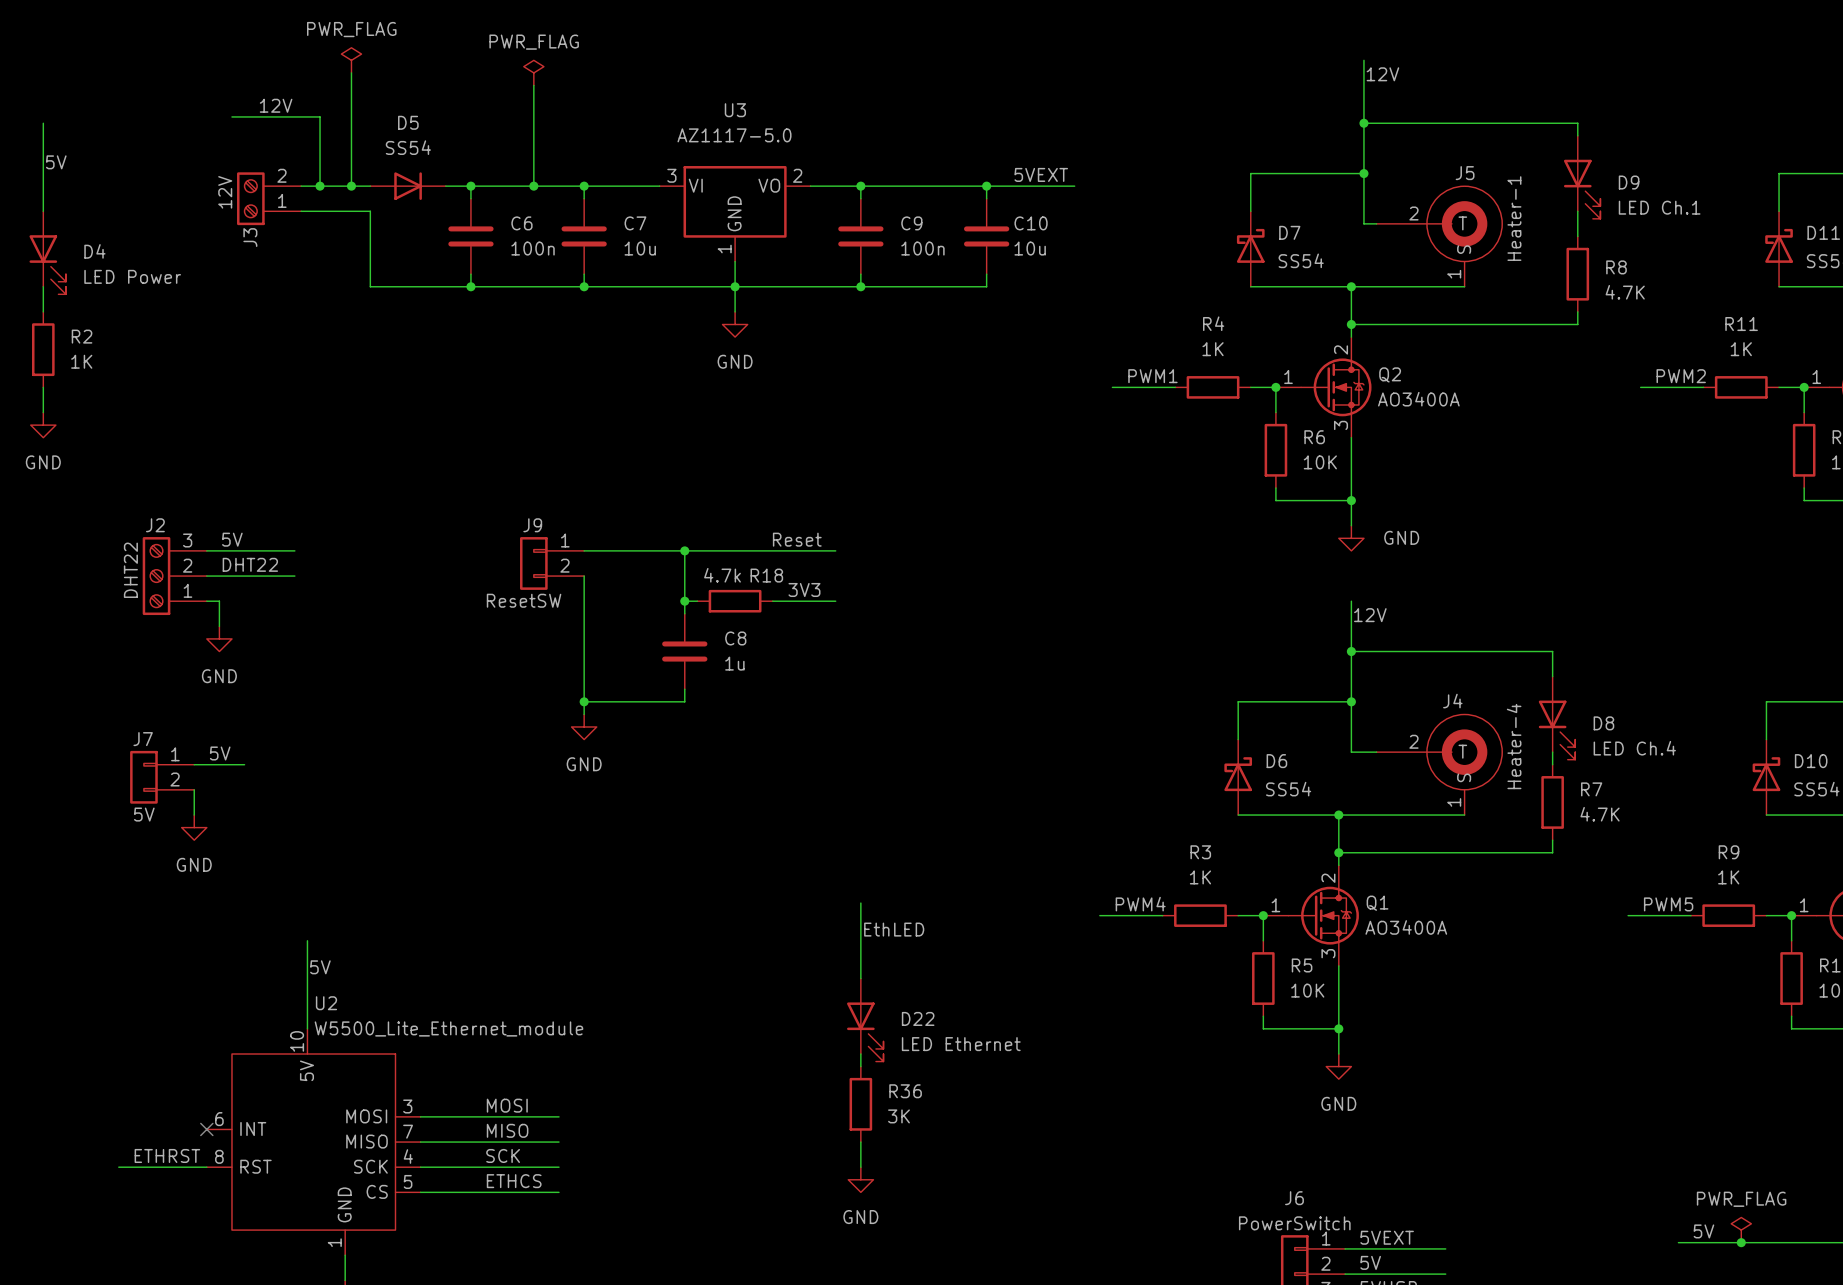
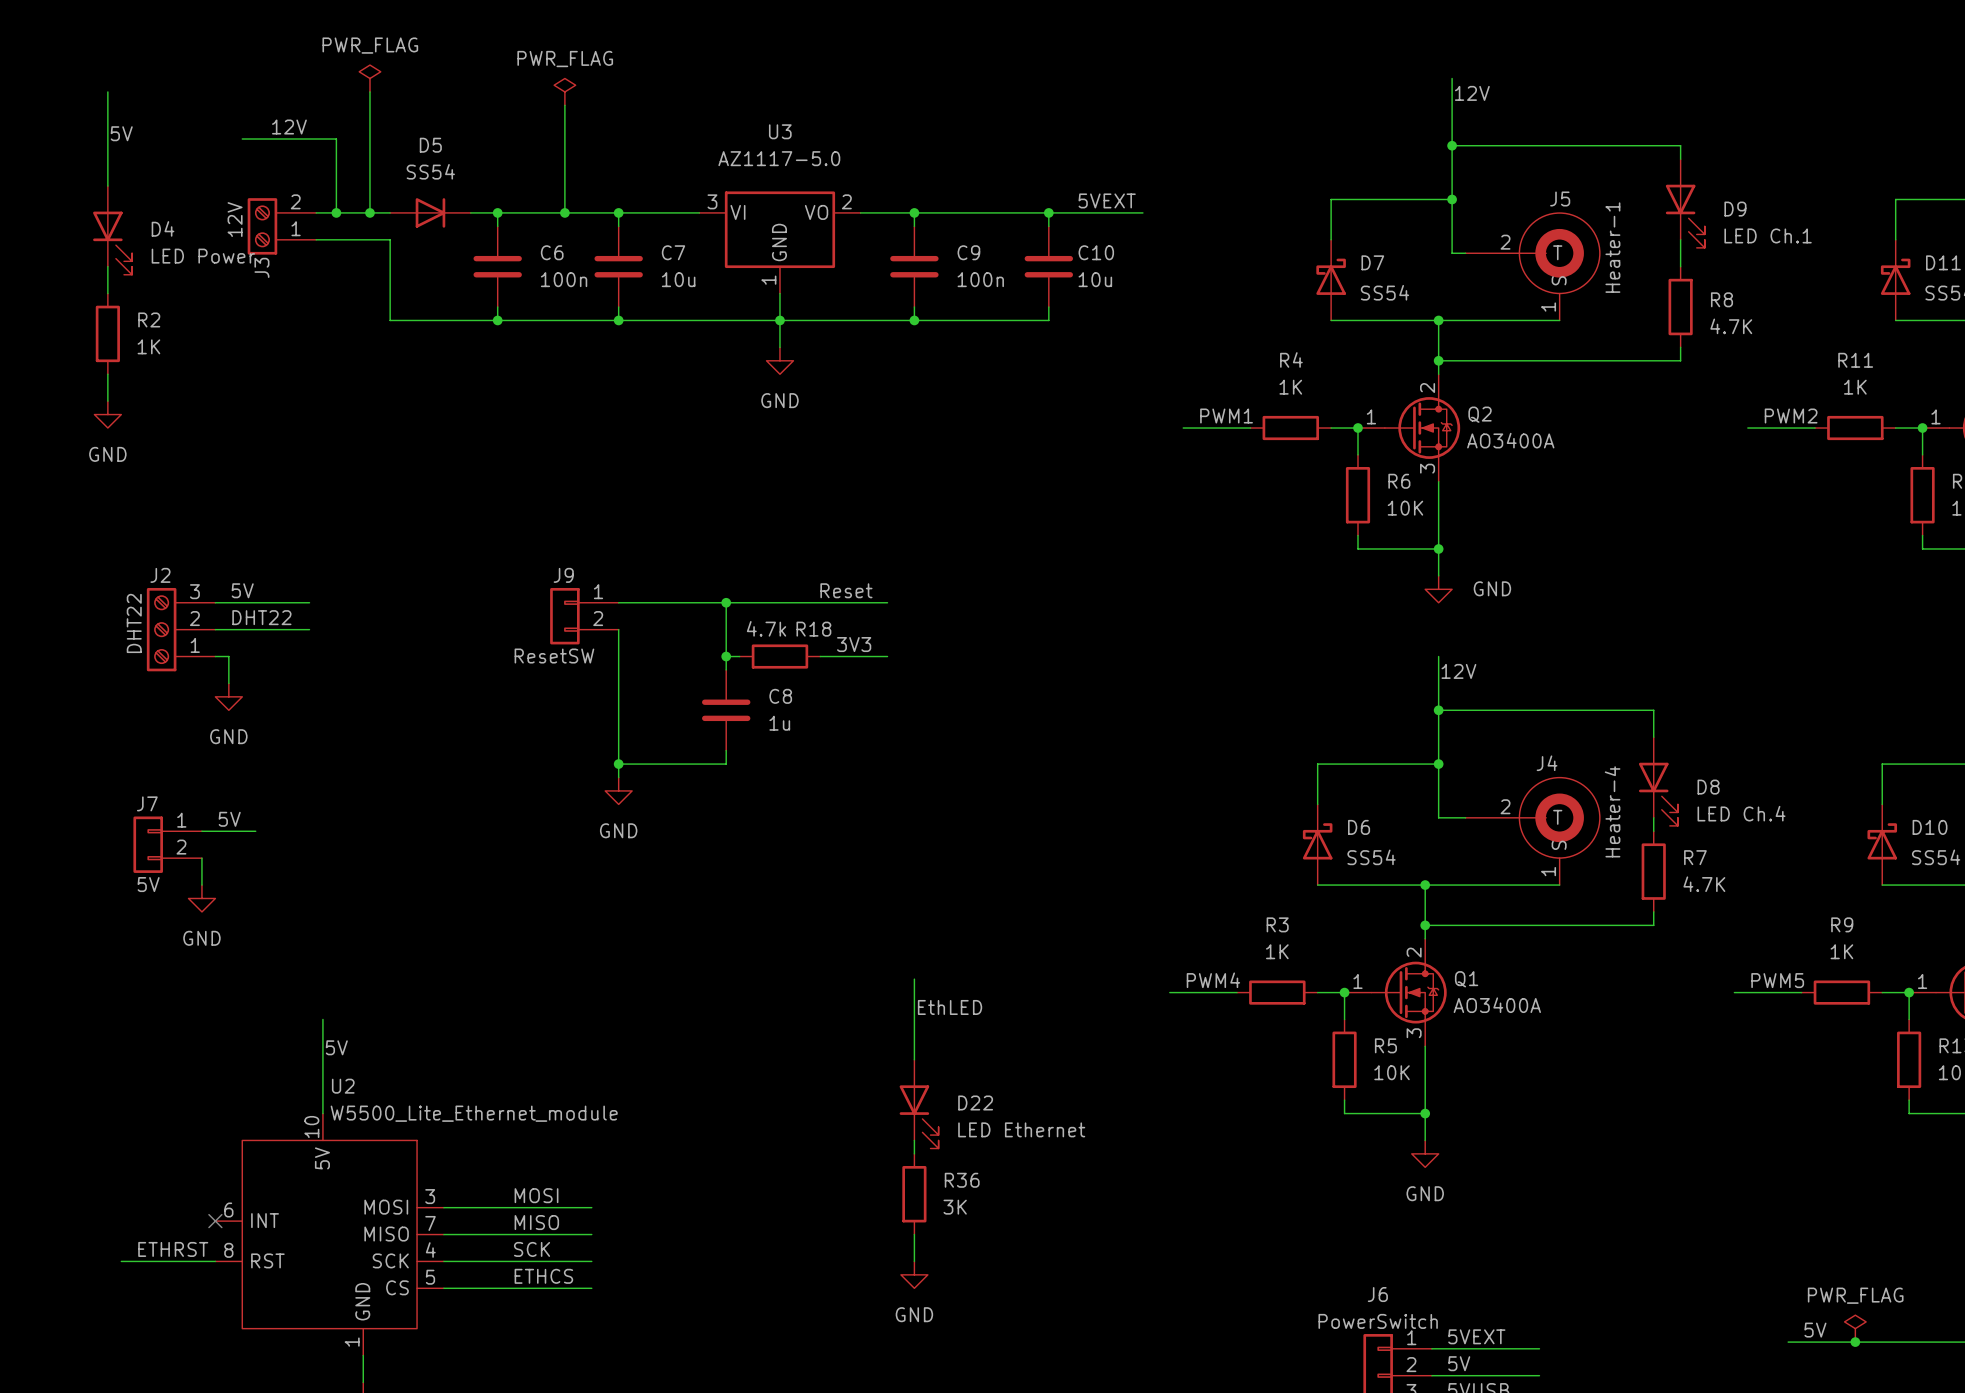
wire: (43, 123) (43, 211) -> (107, 91) (107, 186)
label position: 5V (56, 162) -> 5V (121, 133)
D4 position: (47, 252) -> (112, 230)
wire: (43, 286) (43, 311) -> (107, 266) (107, 293)
R2 position: (43, 349) -> (107, 333)
wire: (43, 387) (43, 412) -> (107, 374) (107, 401)
power symbol position: GND (43, 425) -> GND (107, 414)

